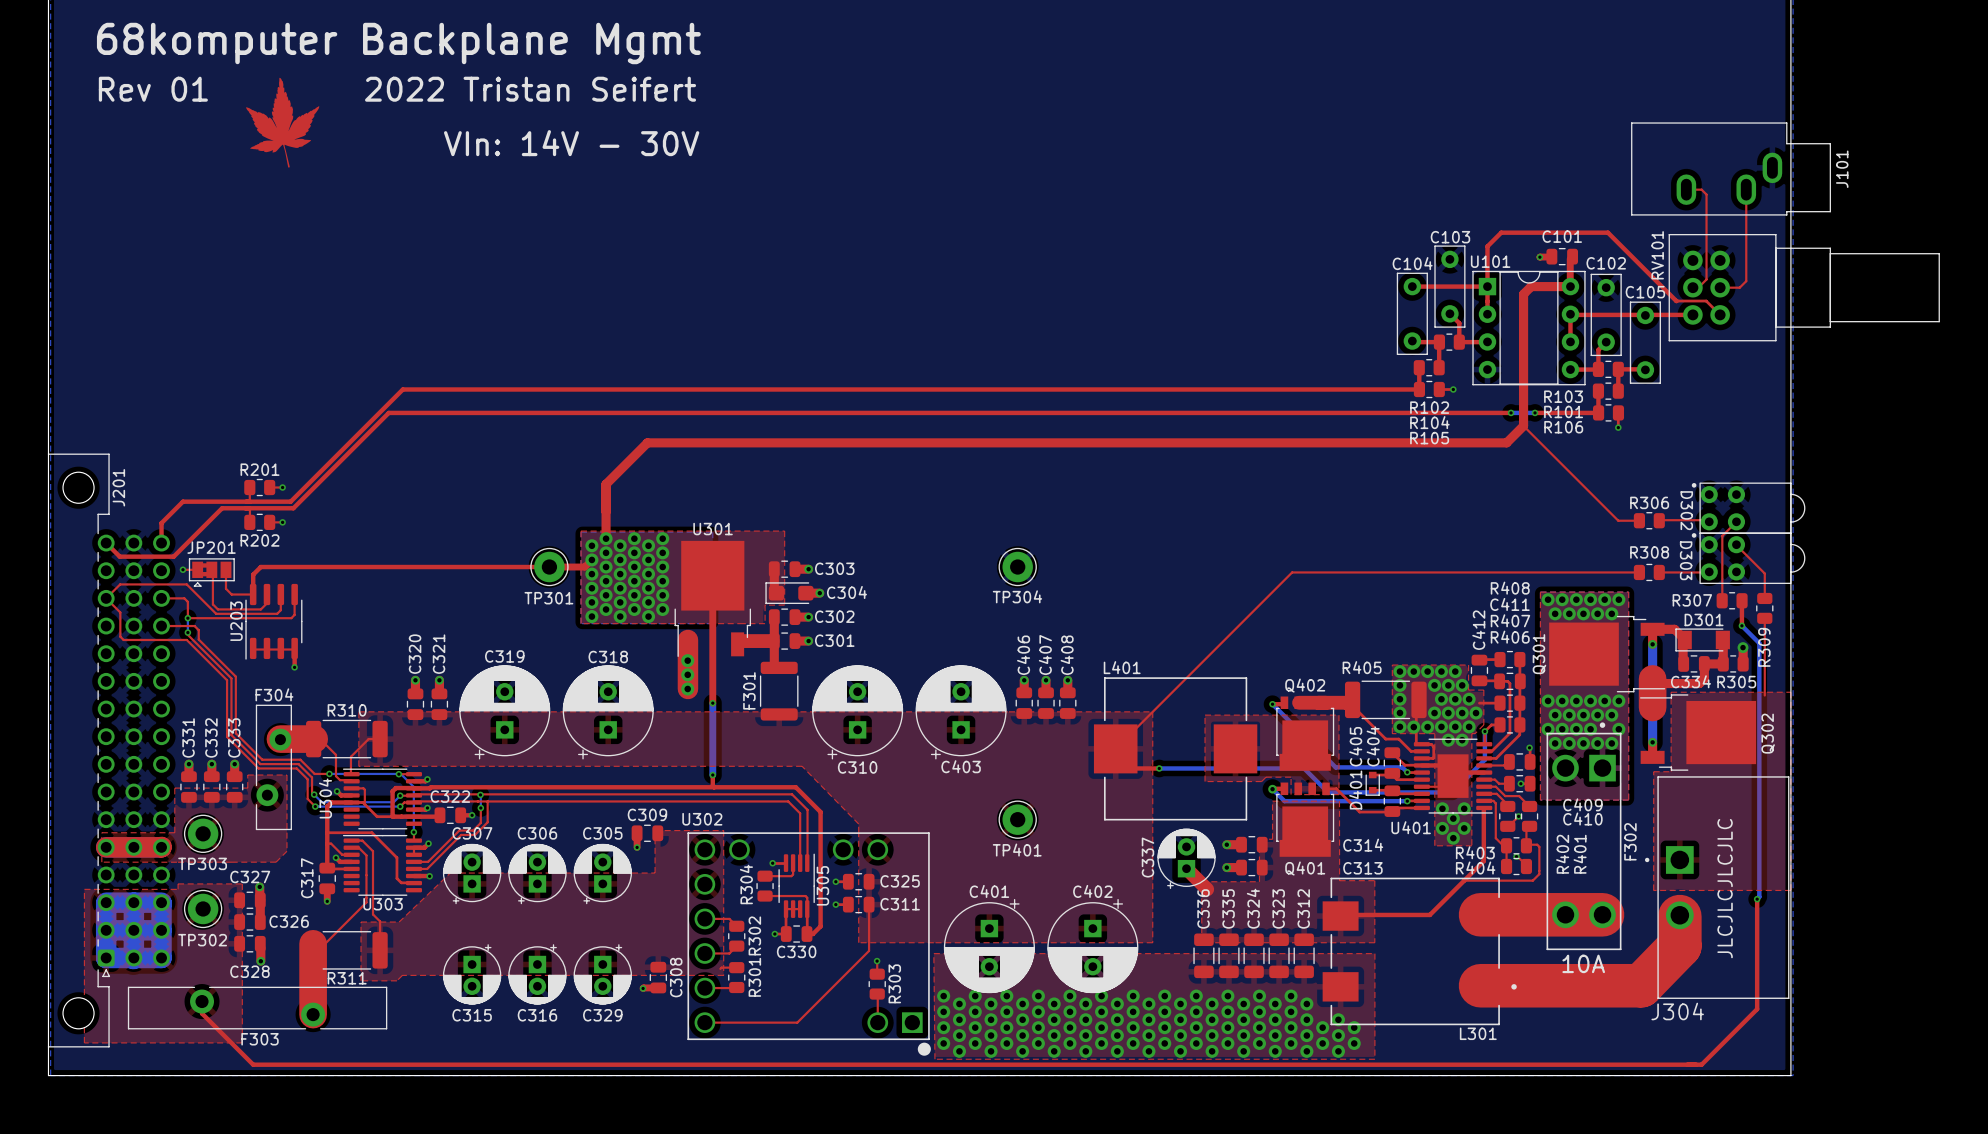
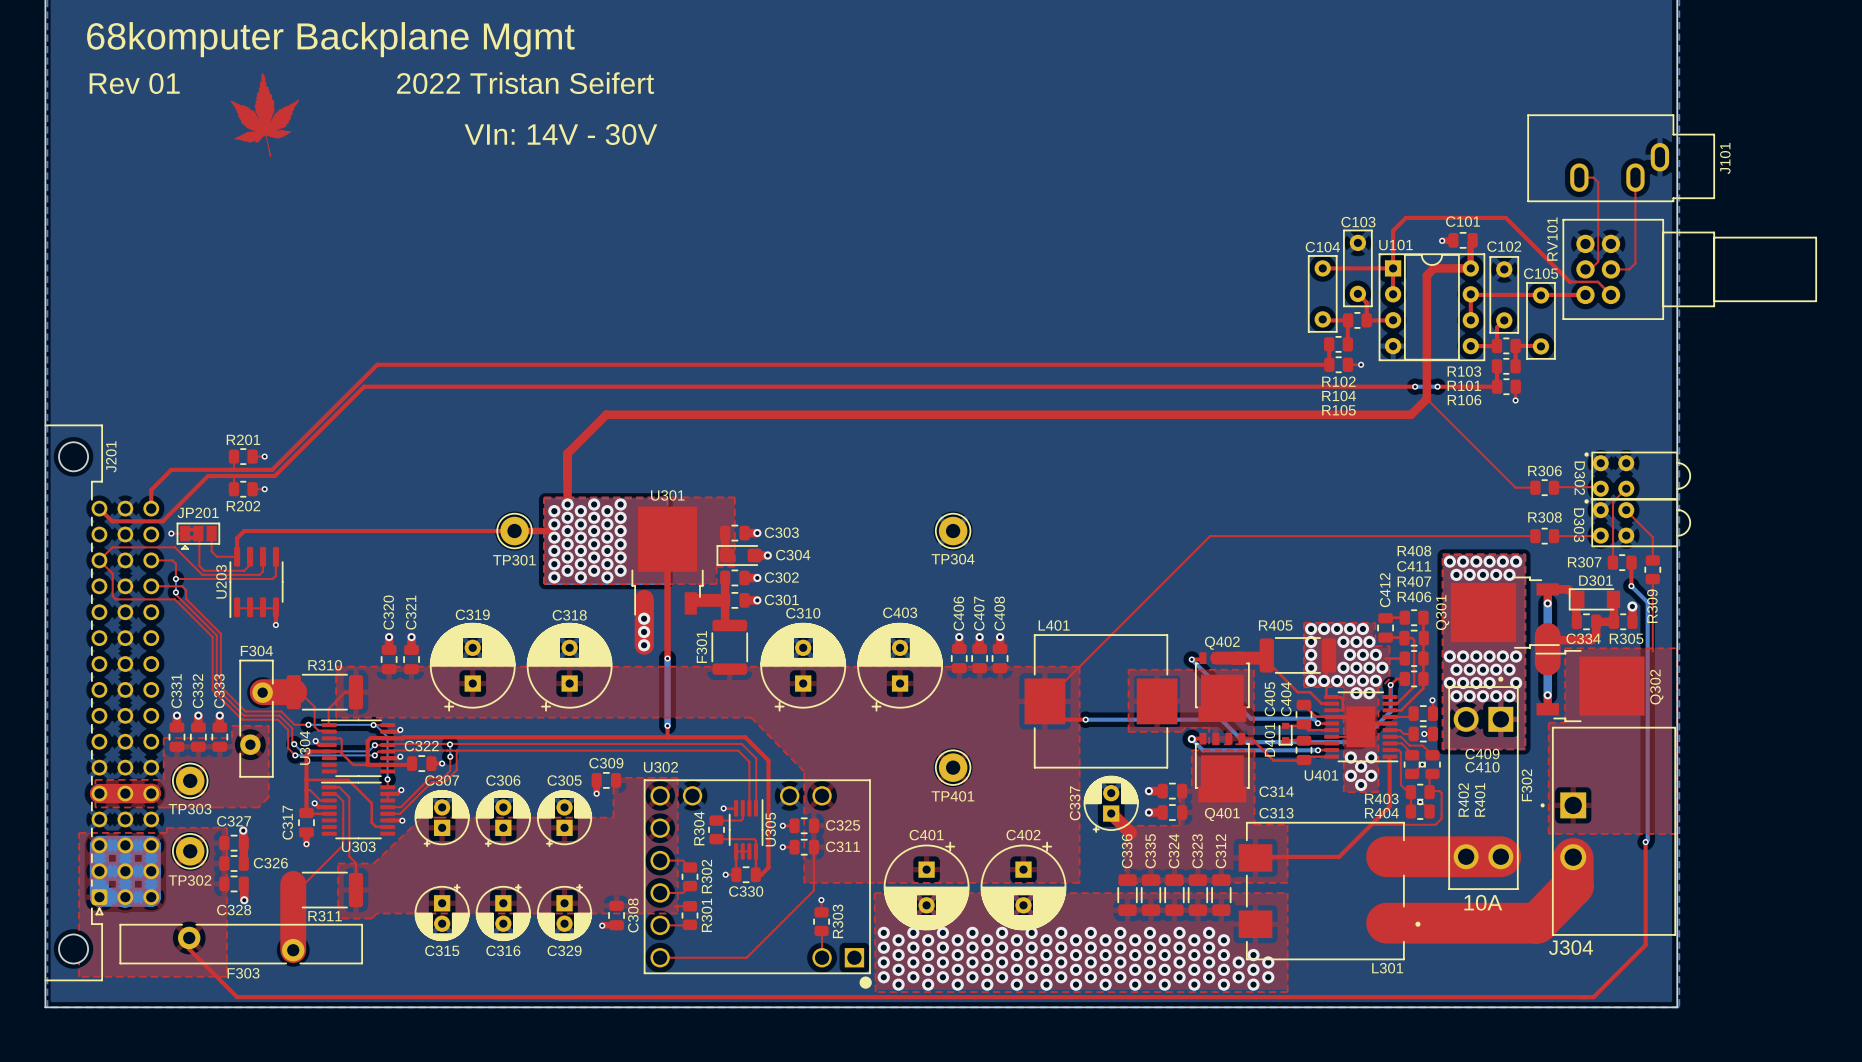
C403 name position: C403 (961, 766) -> C403 (900, 612)
C310 name position: C310 (857, 767) -> C310 (803, 613)
text: JLCJLCJLCJLC (1725, 888) -> none

